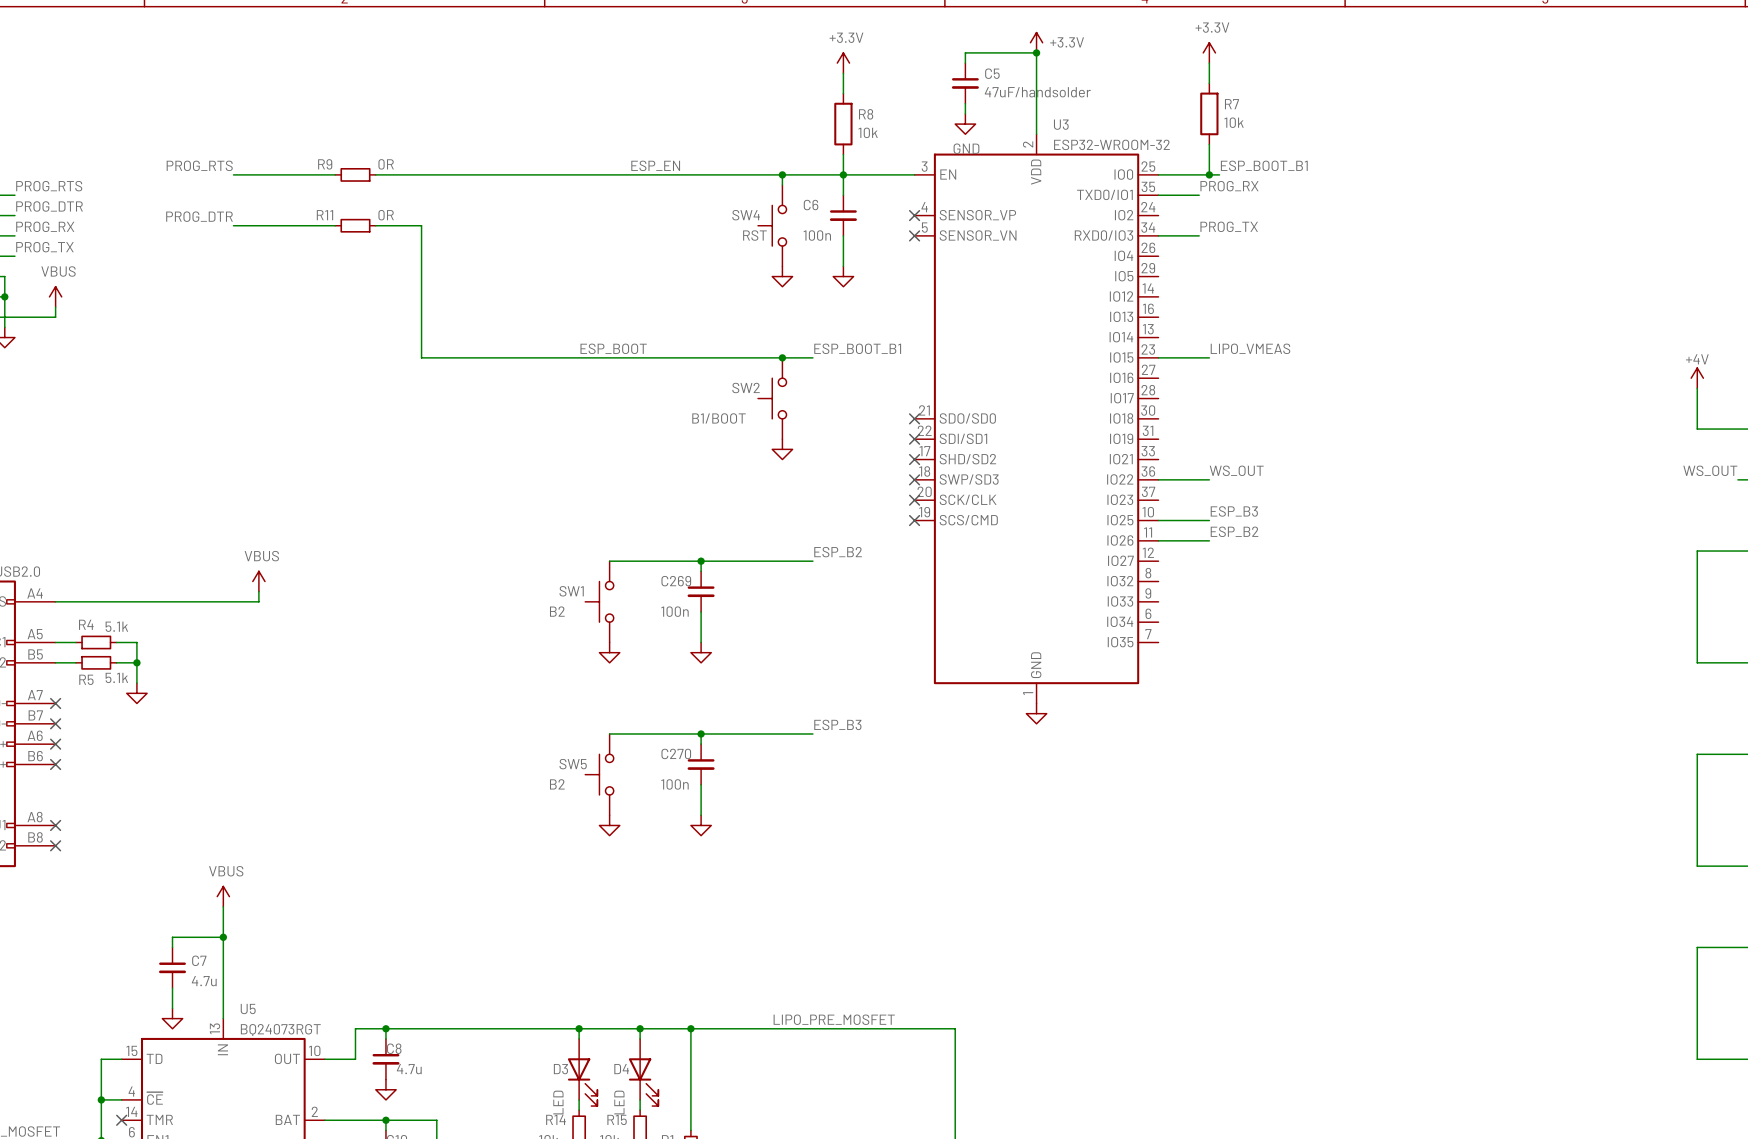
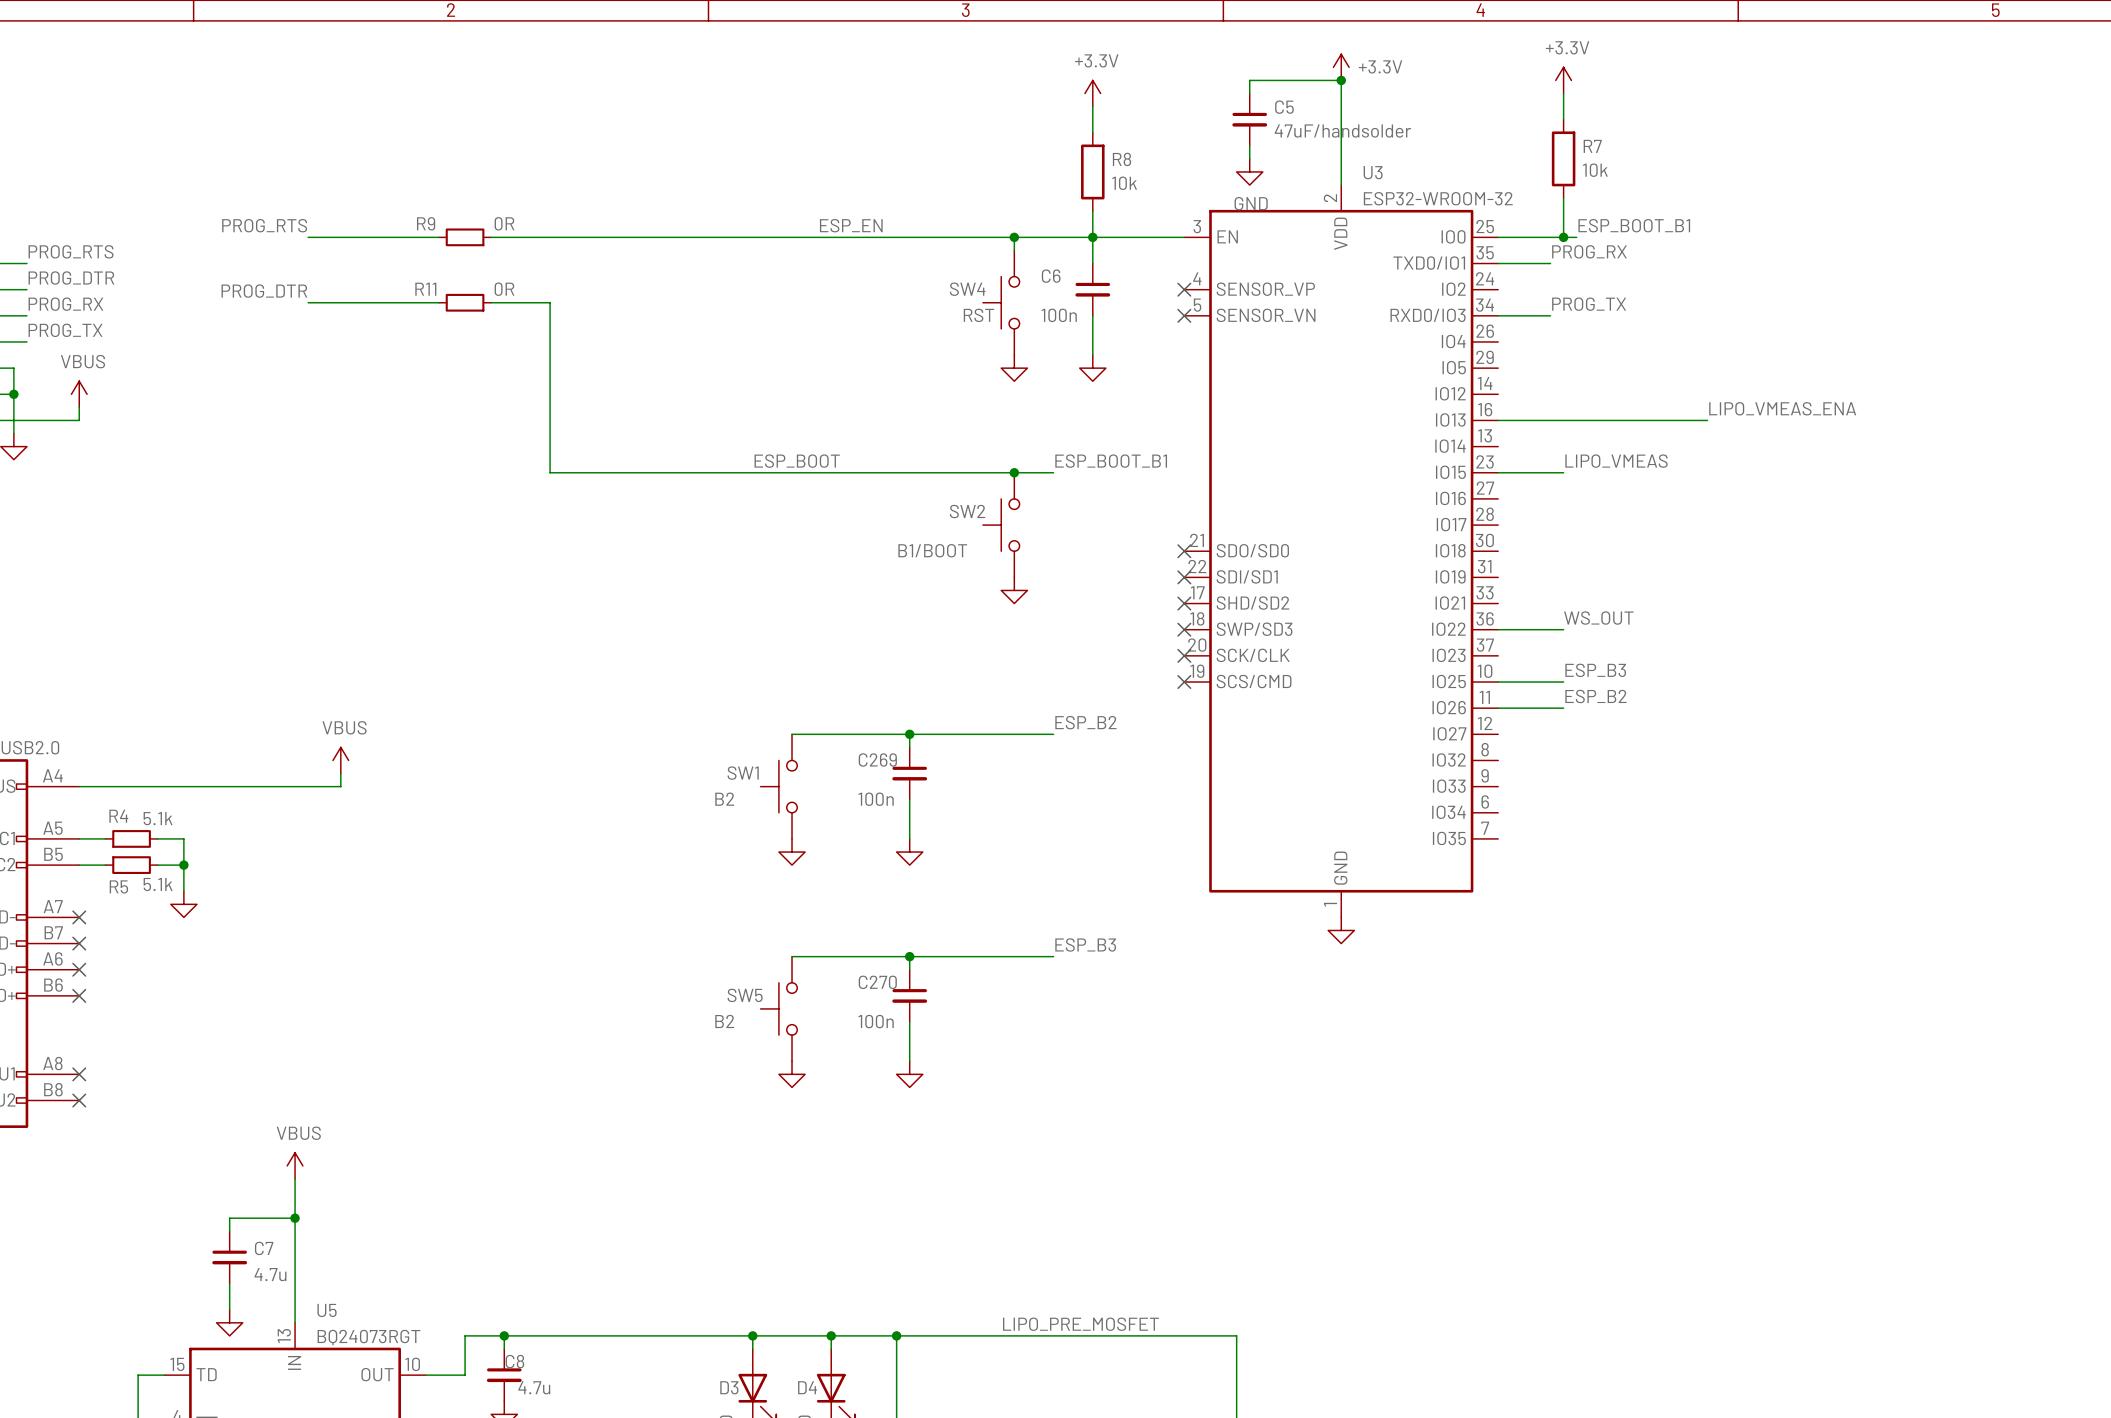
label: none -> LIPO_VMEAS_ENA (1782, 408)
wire: none -> (1498, 420) (1707, 420)

